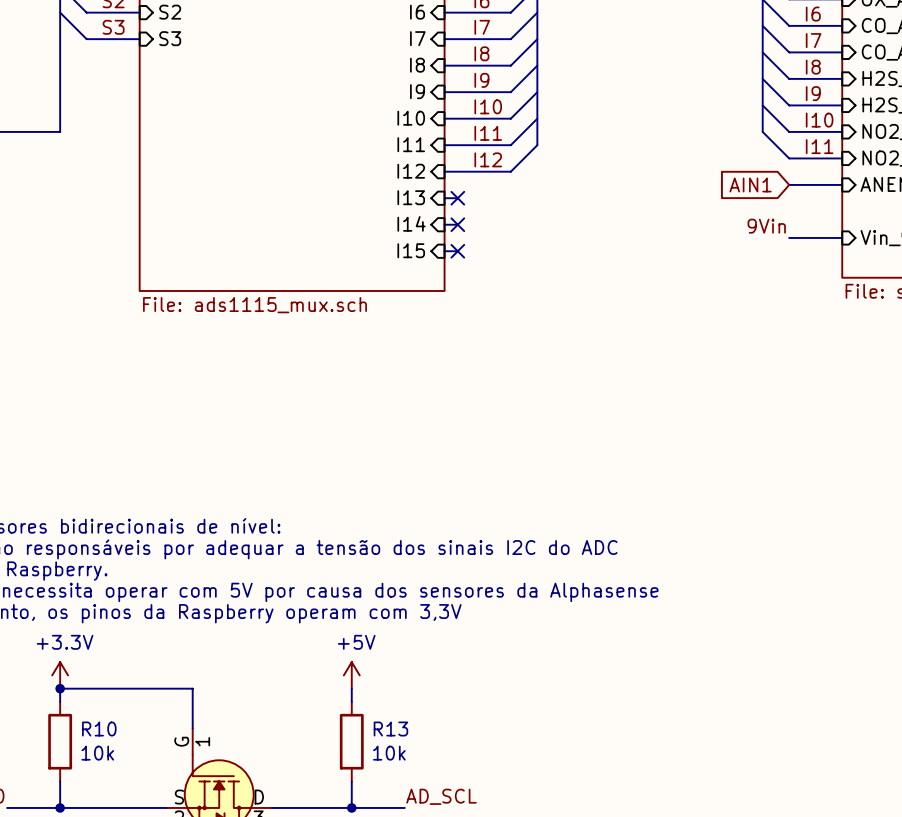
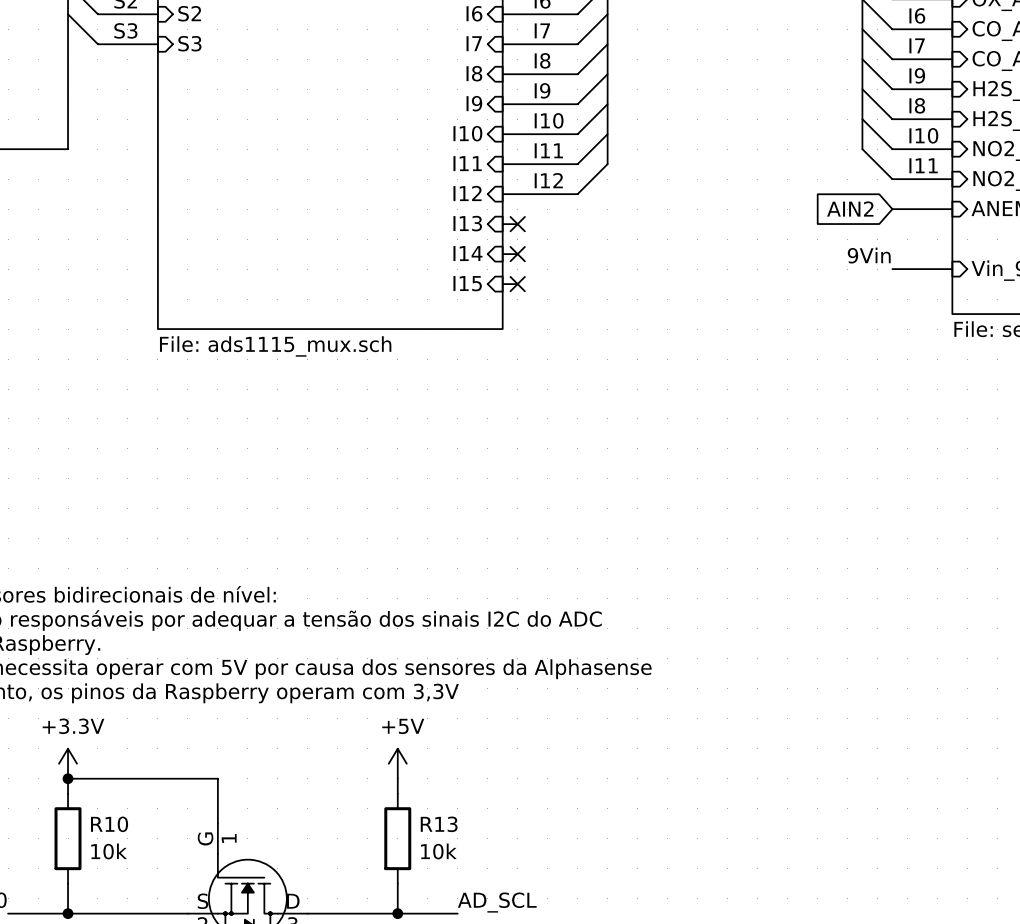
label: I8 (813, 67) -> I9 (917, 75)
label: I9 (813, 93) -> I8 (917, 105)
global label: AIN1 (750, 184) -> AIN2 (850, 209)

